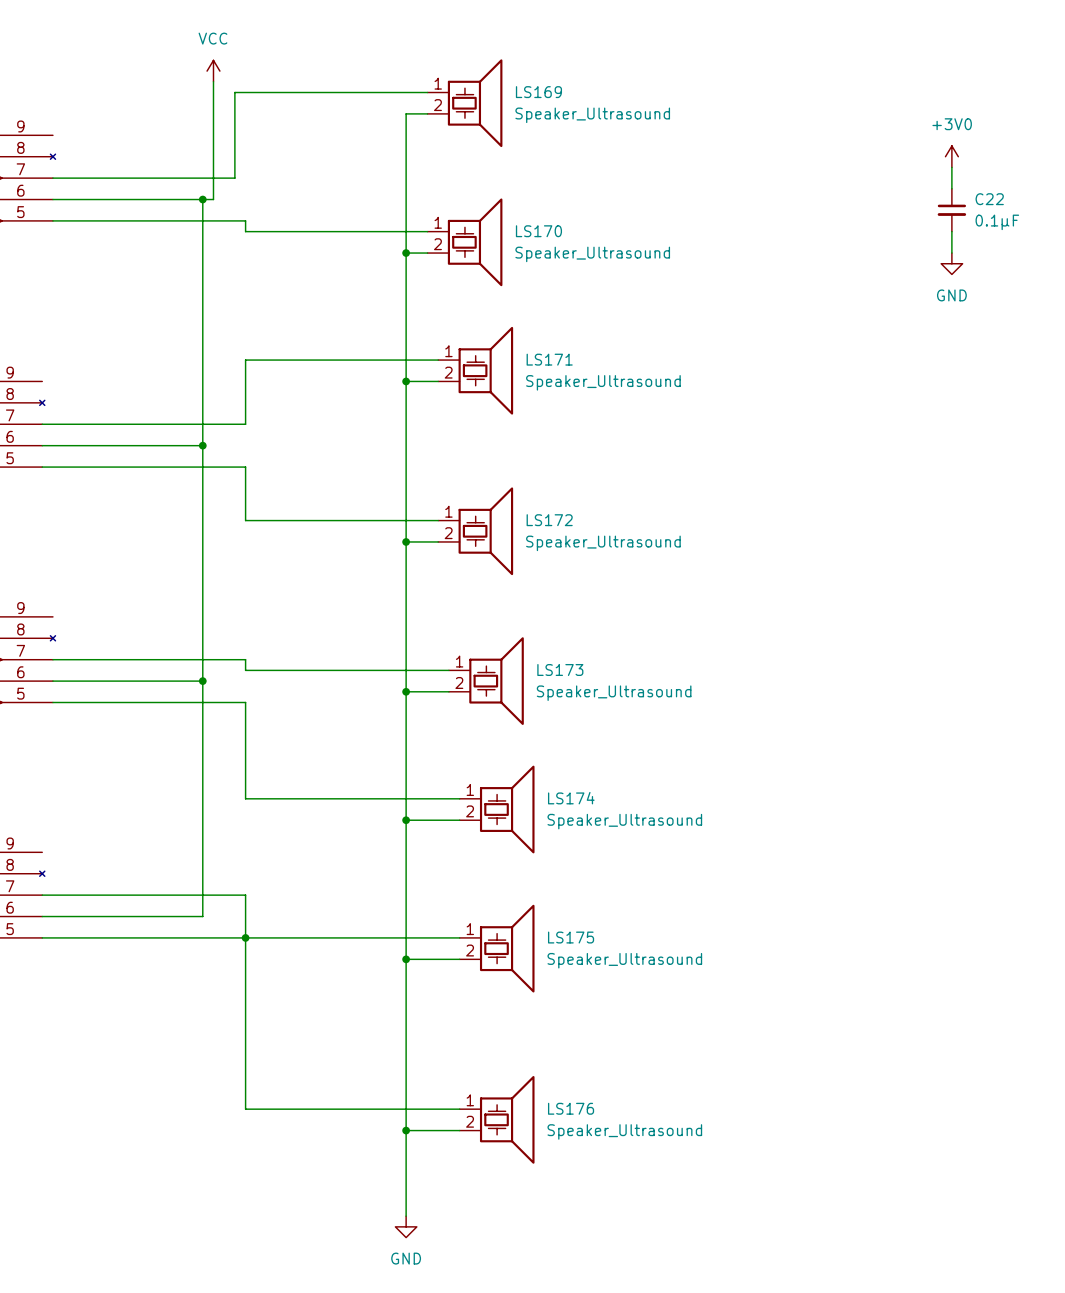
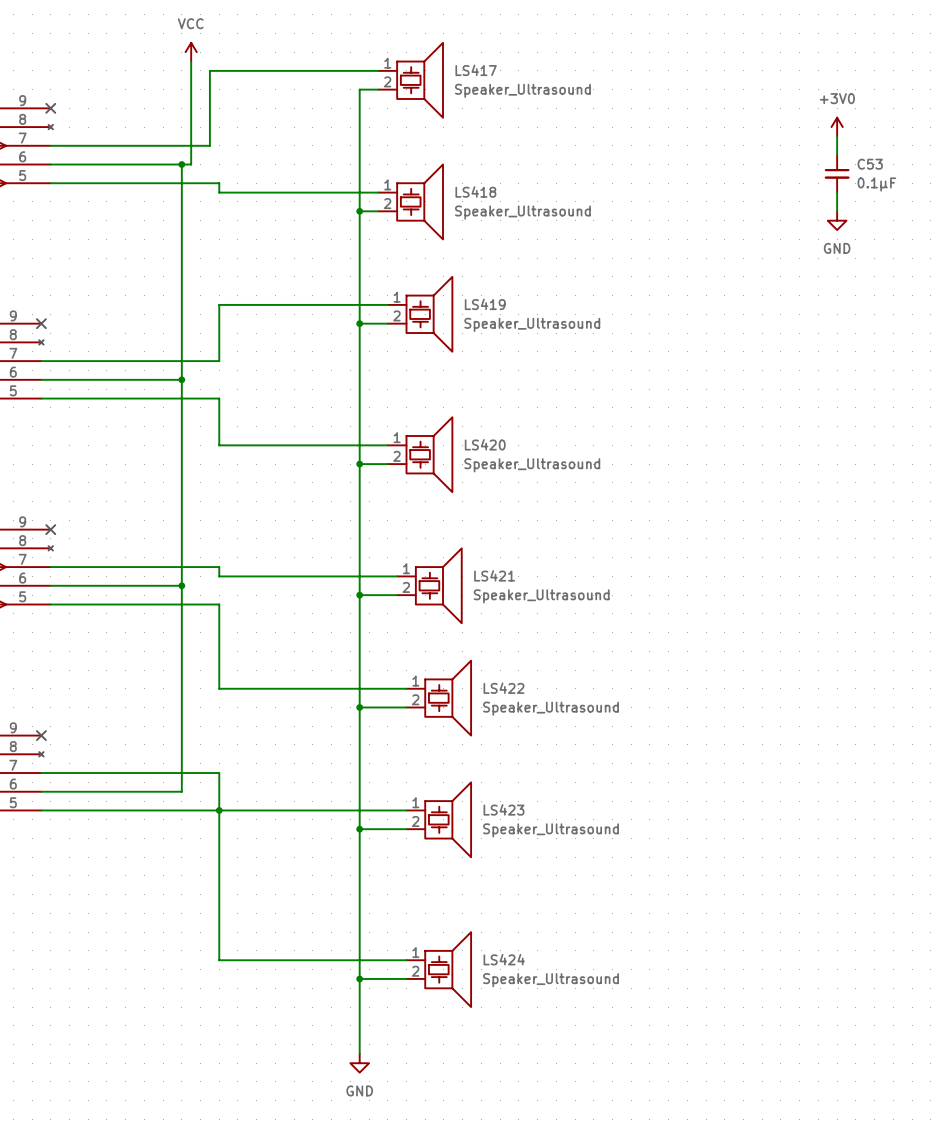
LS169 name: LS169 (538, 92) -> LS417 (476, 70)
no-connect mark: none -> (50, 108)
C22 name: C22 (989, 199) -> C53 (870, 164)
LS170 name: LS170 (538, 231) -> LS418 (475, 192)
LS171 name: LS171 (549, 359) -> LS419 (485, 304)
no-connect mark: none -> (41, 323)
LS172 name: LS172 (549, 520) -> LS420 (485, 444)
no-connect mark: none -> (50, 529)
LS173 name: LS173 (560, 669) -> LS421 (494, 575)
LS174 name: LS174 (571, 798) -> LS422 (503, 688)
no-connect mark: none -> (41, 735)
LS175 name: LS175 (571, 937) -> LS423 (503, 809)
LS176 name: LS176 (571, 1108) -> LS424 (504, 959)

